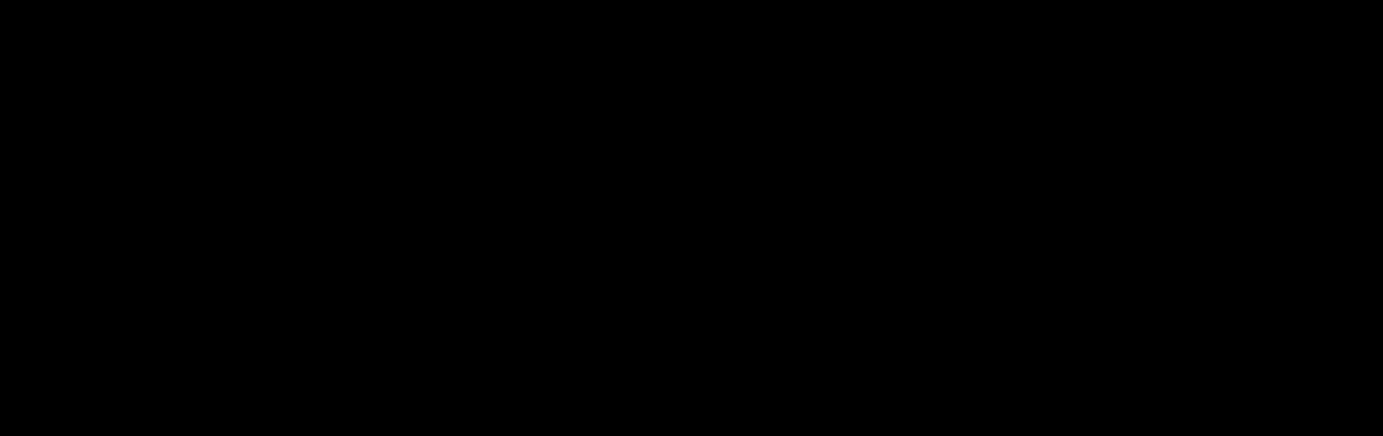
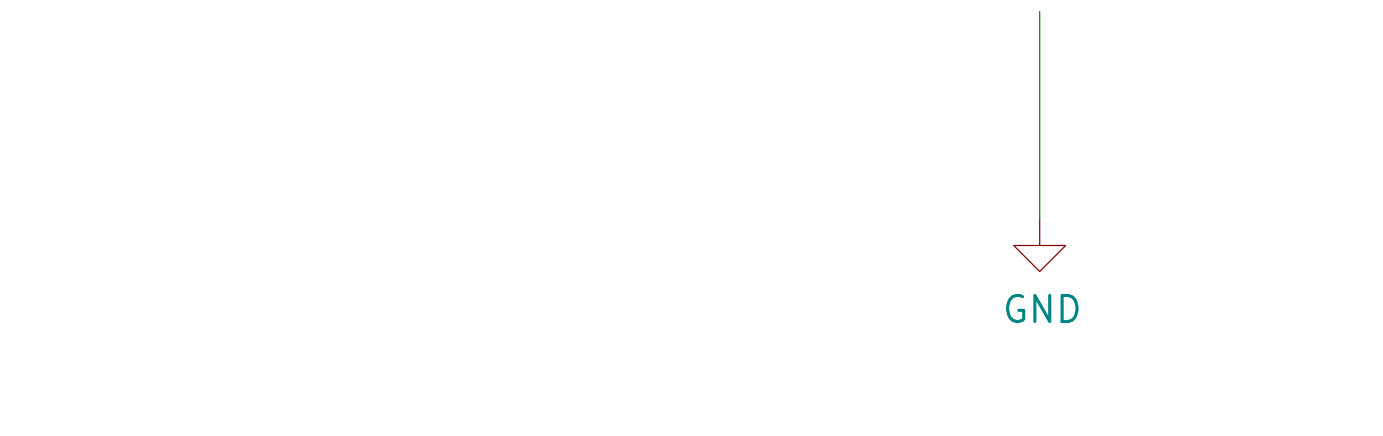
wire: none -> (1039, 11) (1039, 219)
power symbol: none -> GND (1039, 245)

